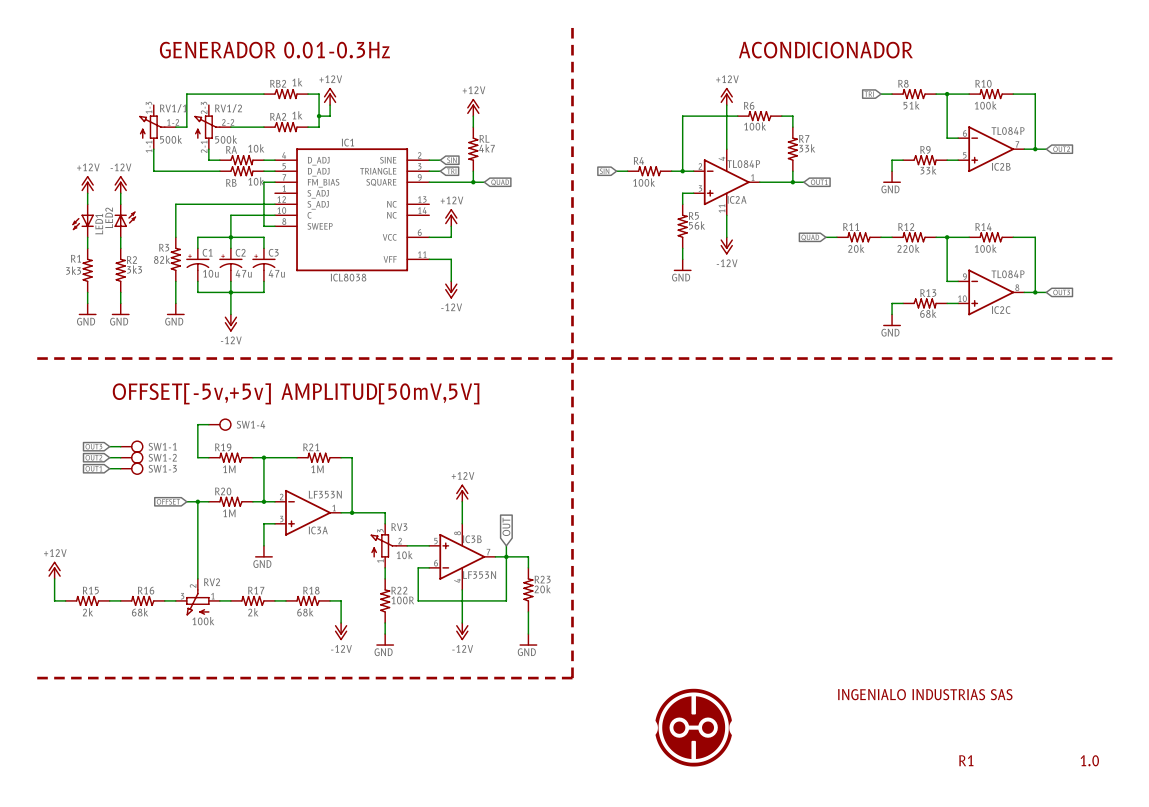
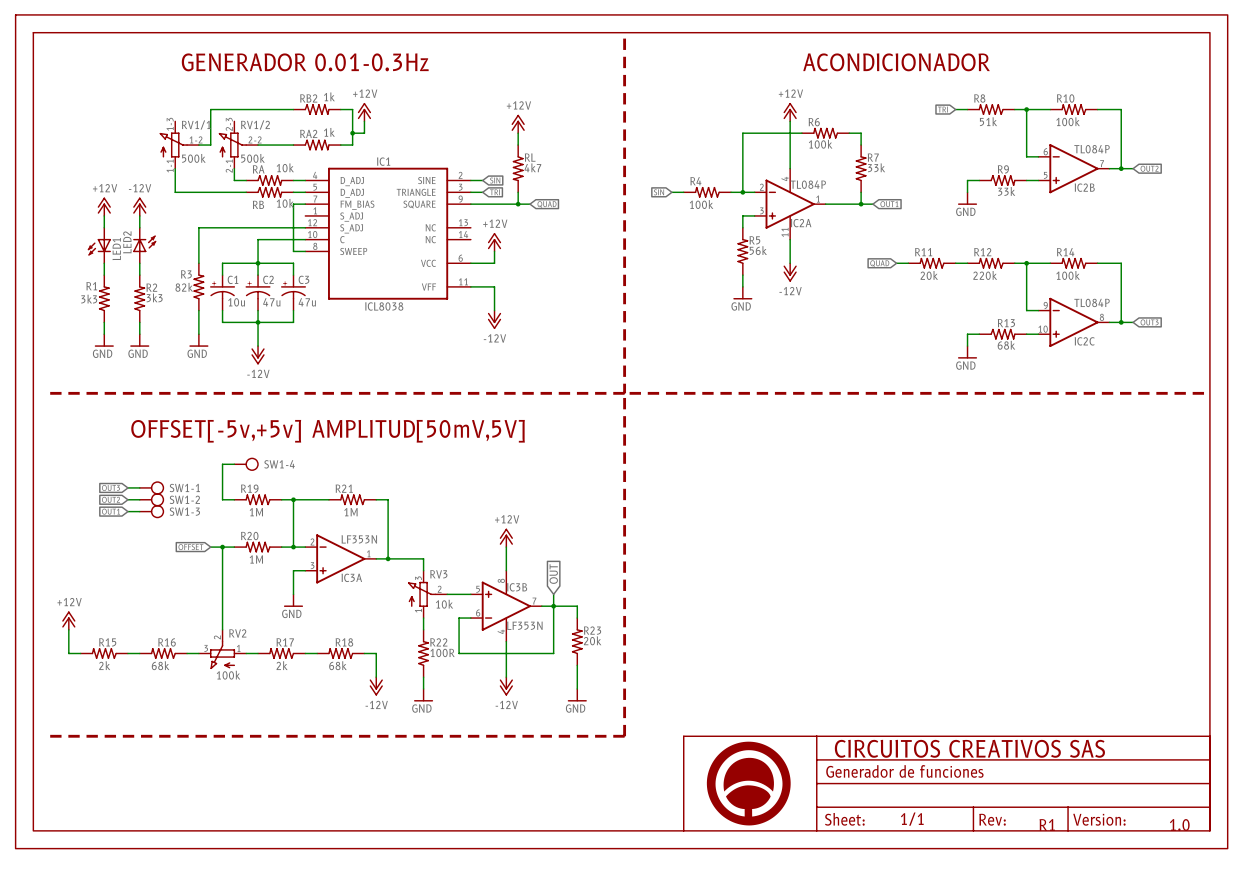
part: none -> (621, 431)
text: INGENIALO INDUSTRIAS SAS (925, 694) -> none
part: (693, 727) -> none

